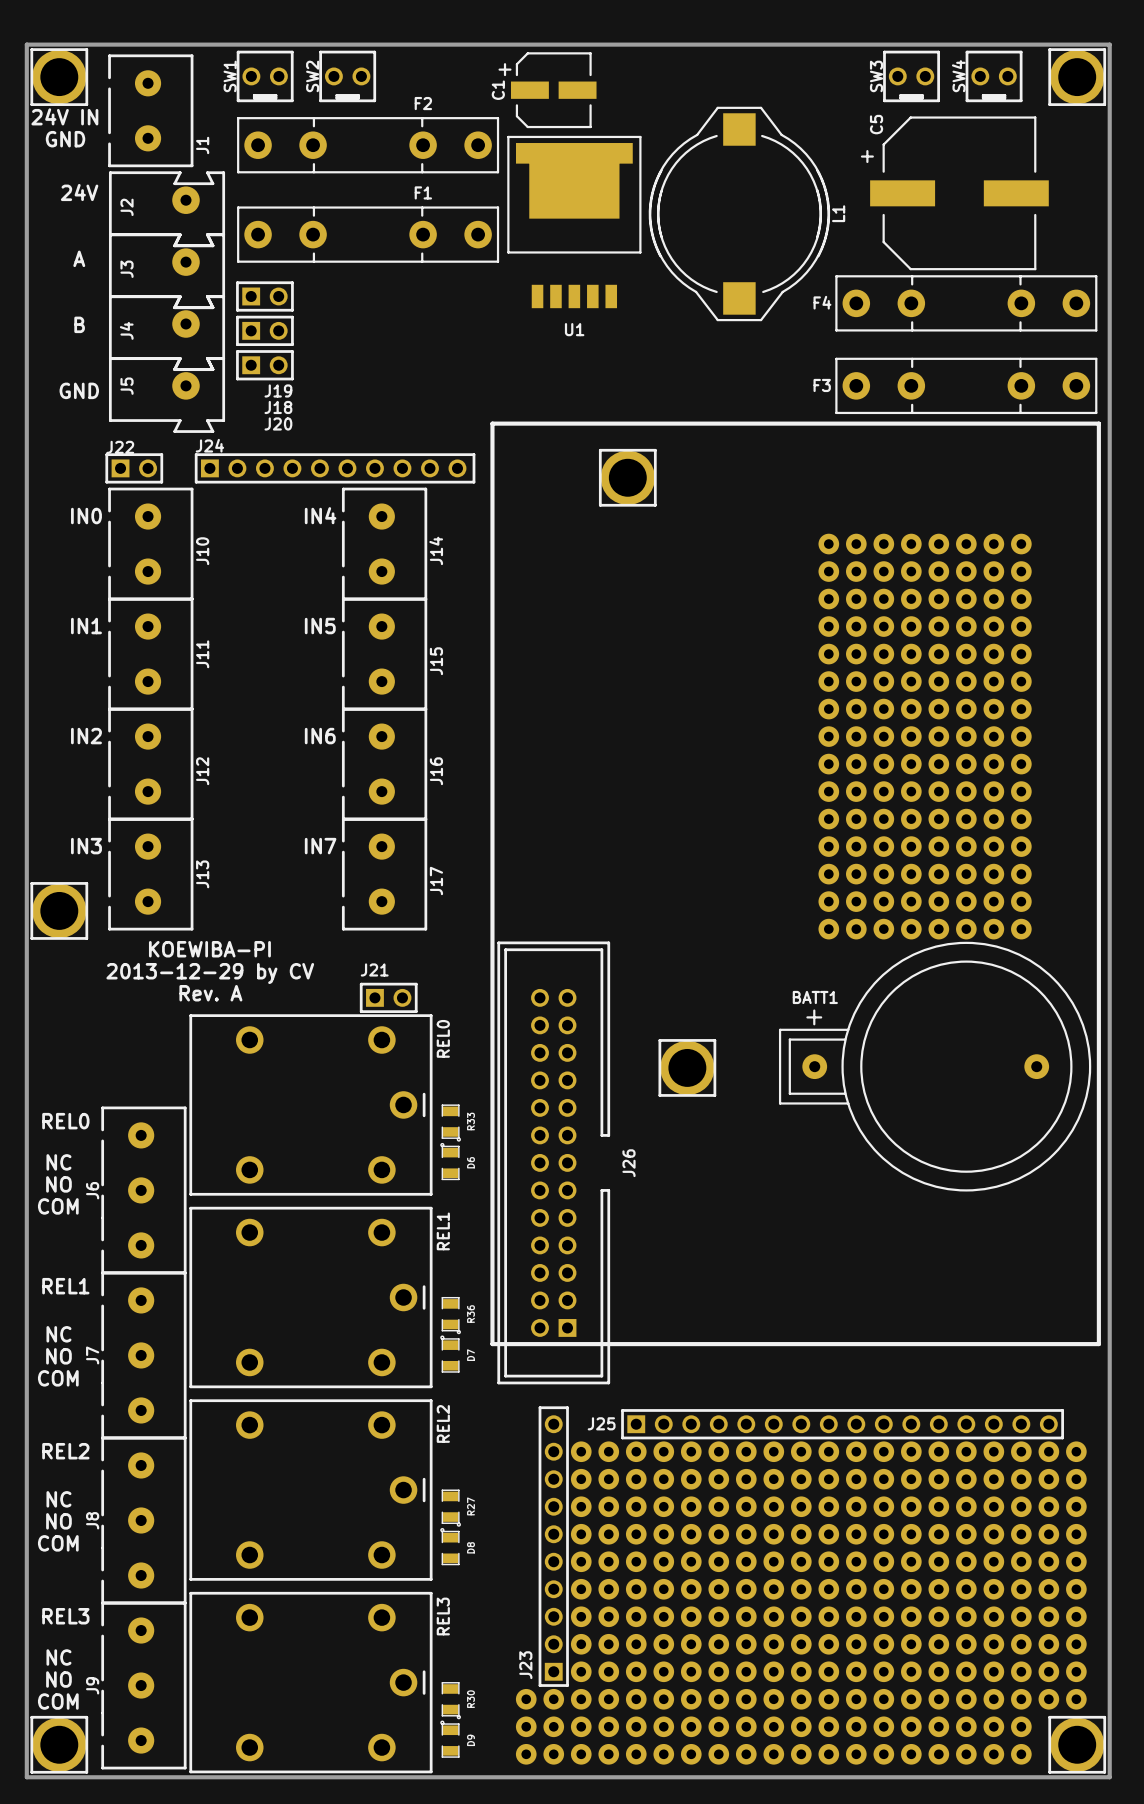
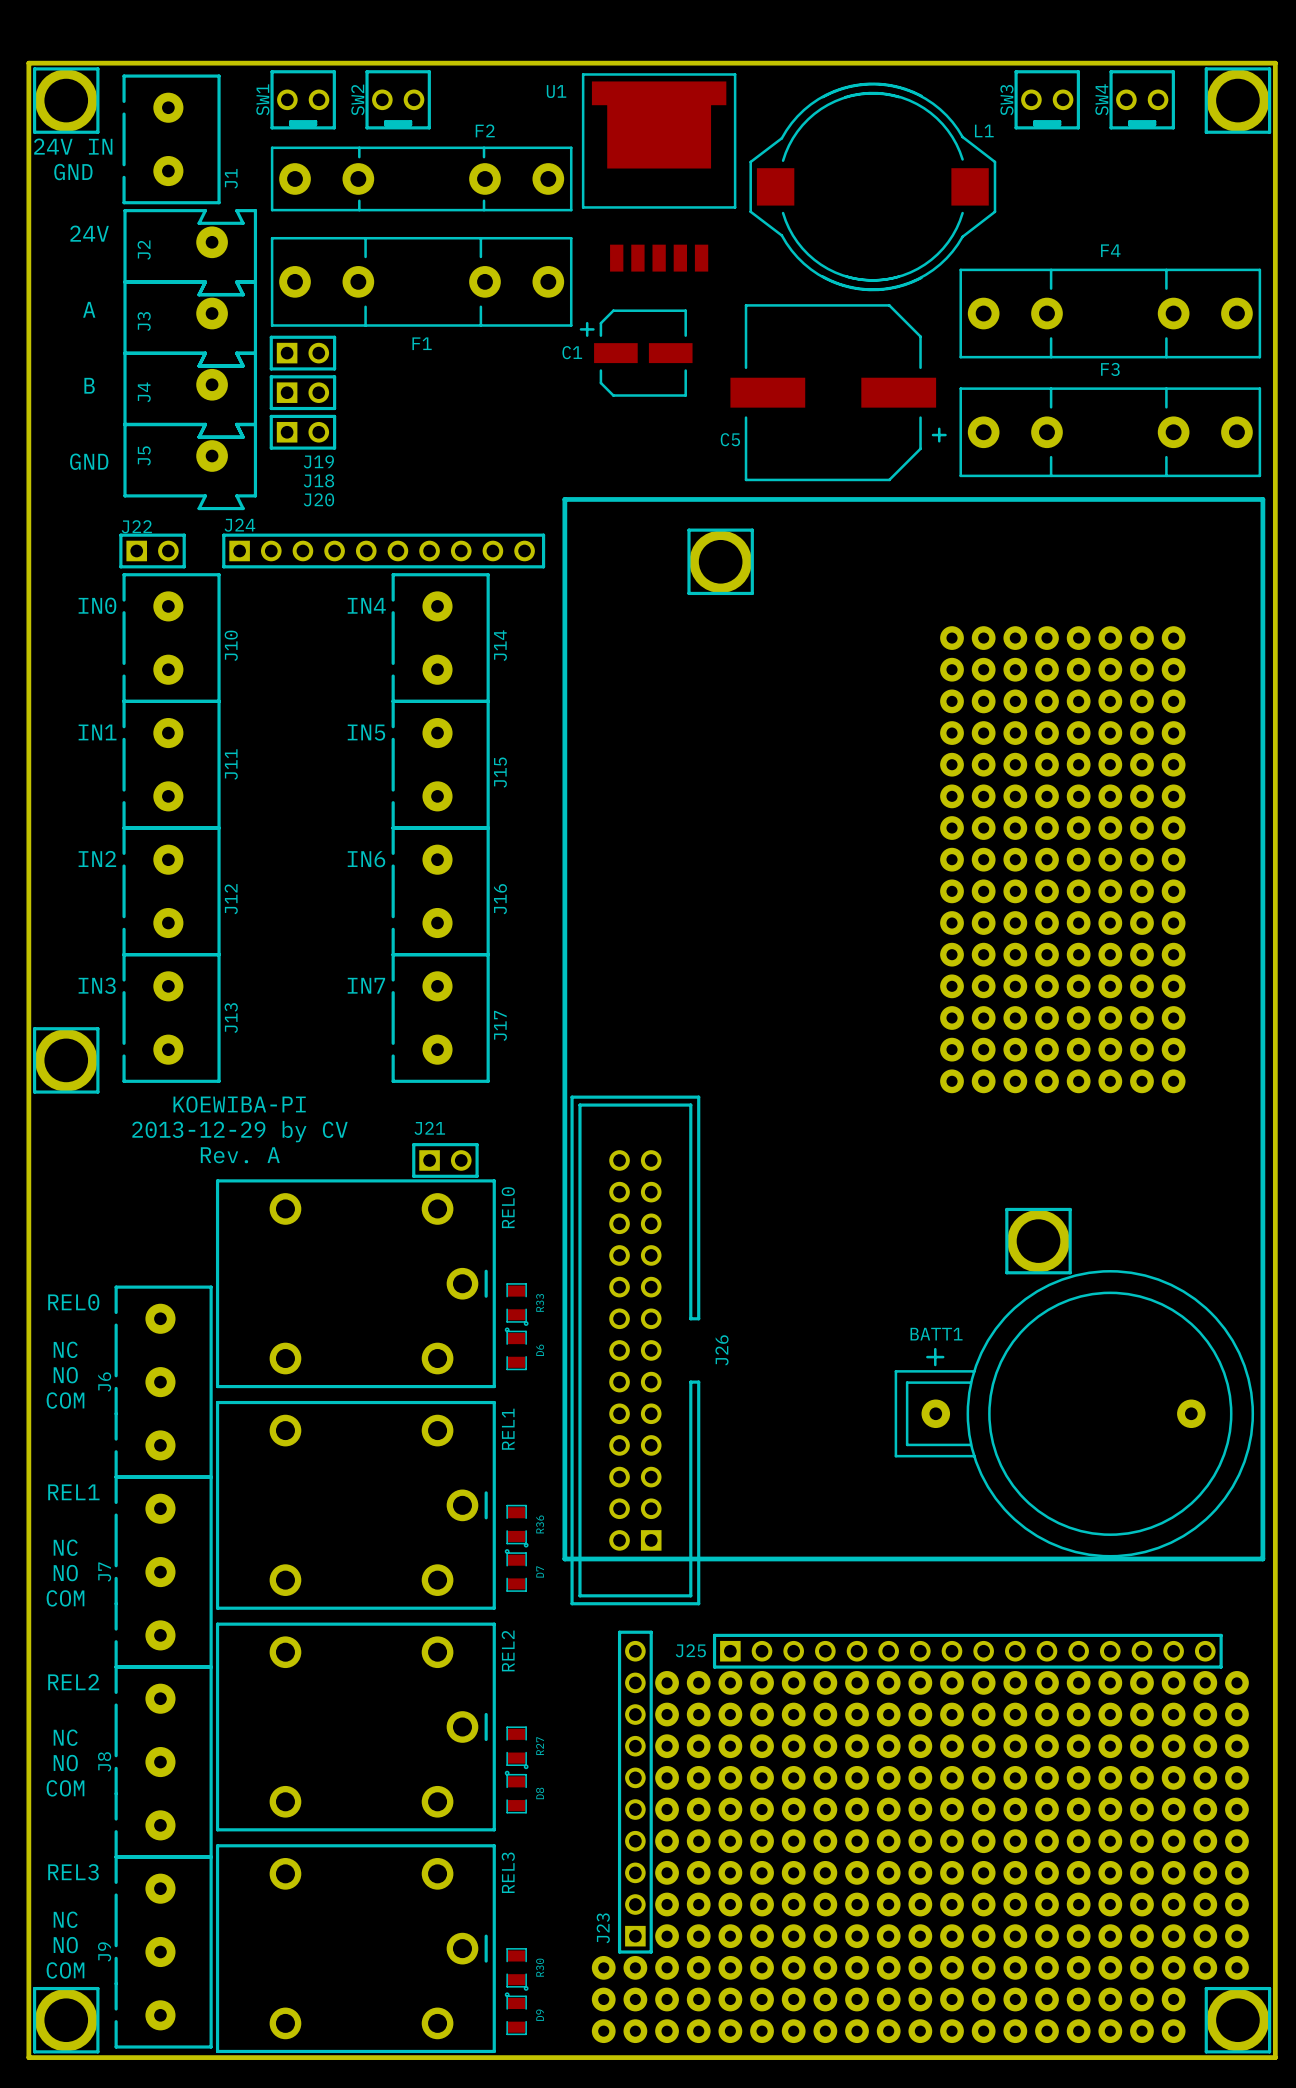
C1 name rotation: 0° (498, 90) -> 90° clockwise (572, 352)
C1 position: (547, 90) -> (636, 353)
C5 name position: C5 (876, 124) -> C5 (730, 439)
F1 name position: F1 (423, 192) -> F1 (422, 343)
C5 rotation: 0° (954, 193) -> 180° (838, 392)
C5 position: (954, 193) -> (838, 392)
F1 footprint: [237, 206, 500, 263] -> [270, 236, 573, 327]
L1 rotation: 0° (739, 213) -> 90° counterclockwise (872, 186)
L1 name position: L1 (838, 213) -> L1 (984, 131)
U1 position: (574, 222) -> (659, 172)
F4 footprint: [835, 275, 1098, 332] -> [959, 268, 1262, 359]
F4 name position: F4 (822, 302) -> F4 (1110, 250)
U1 name position: U1 (574, 329) -> U1 (556, 91)
F3 footprint: [835, 357, 1098, 415] -> [959, 387, 1262, 478]
F3 name position: F3 (822, 385) -> F3 (1110, 369)
BATT1 position: (935, 1066) -> (1074, 1413)
part position: (687, 1067) -> (1038, 1241)

